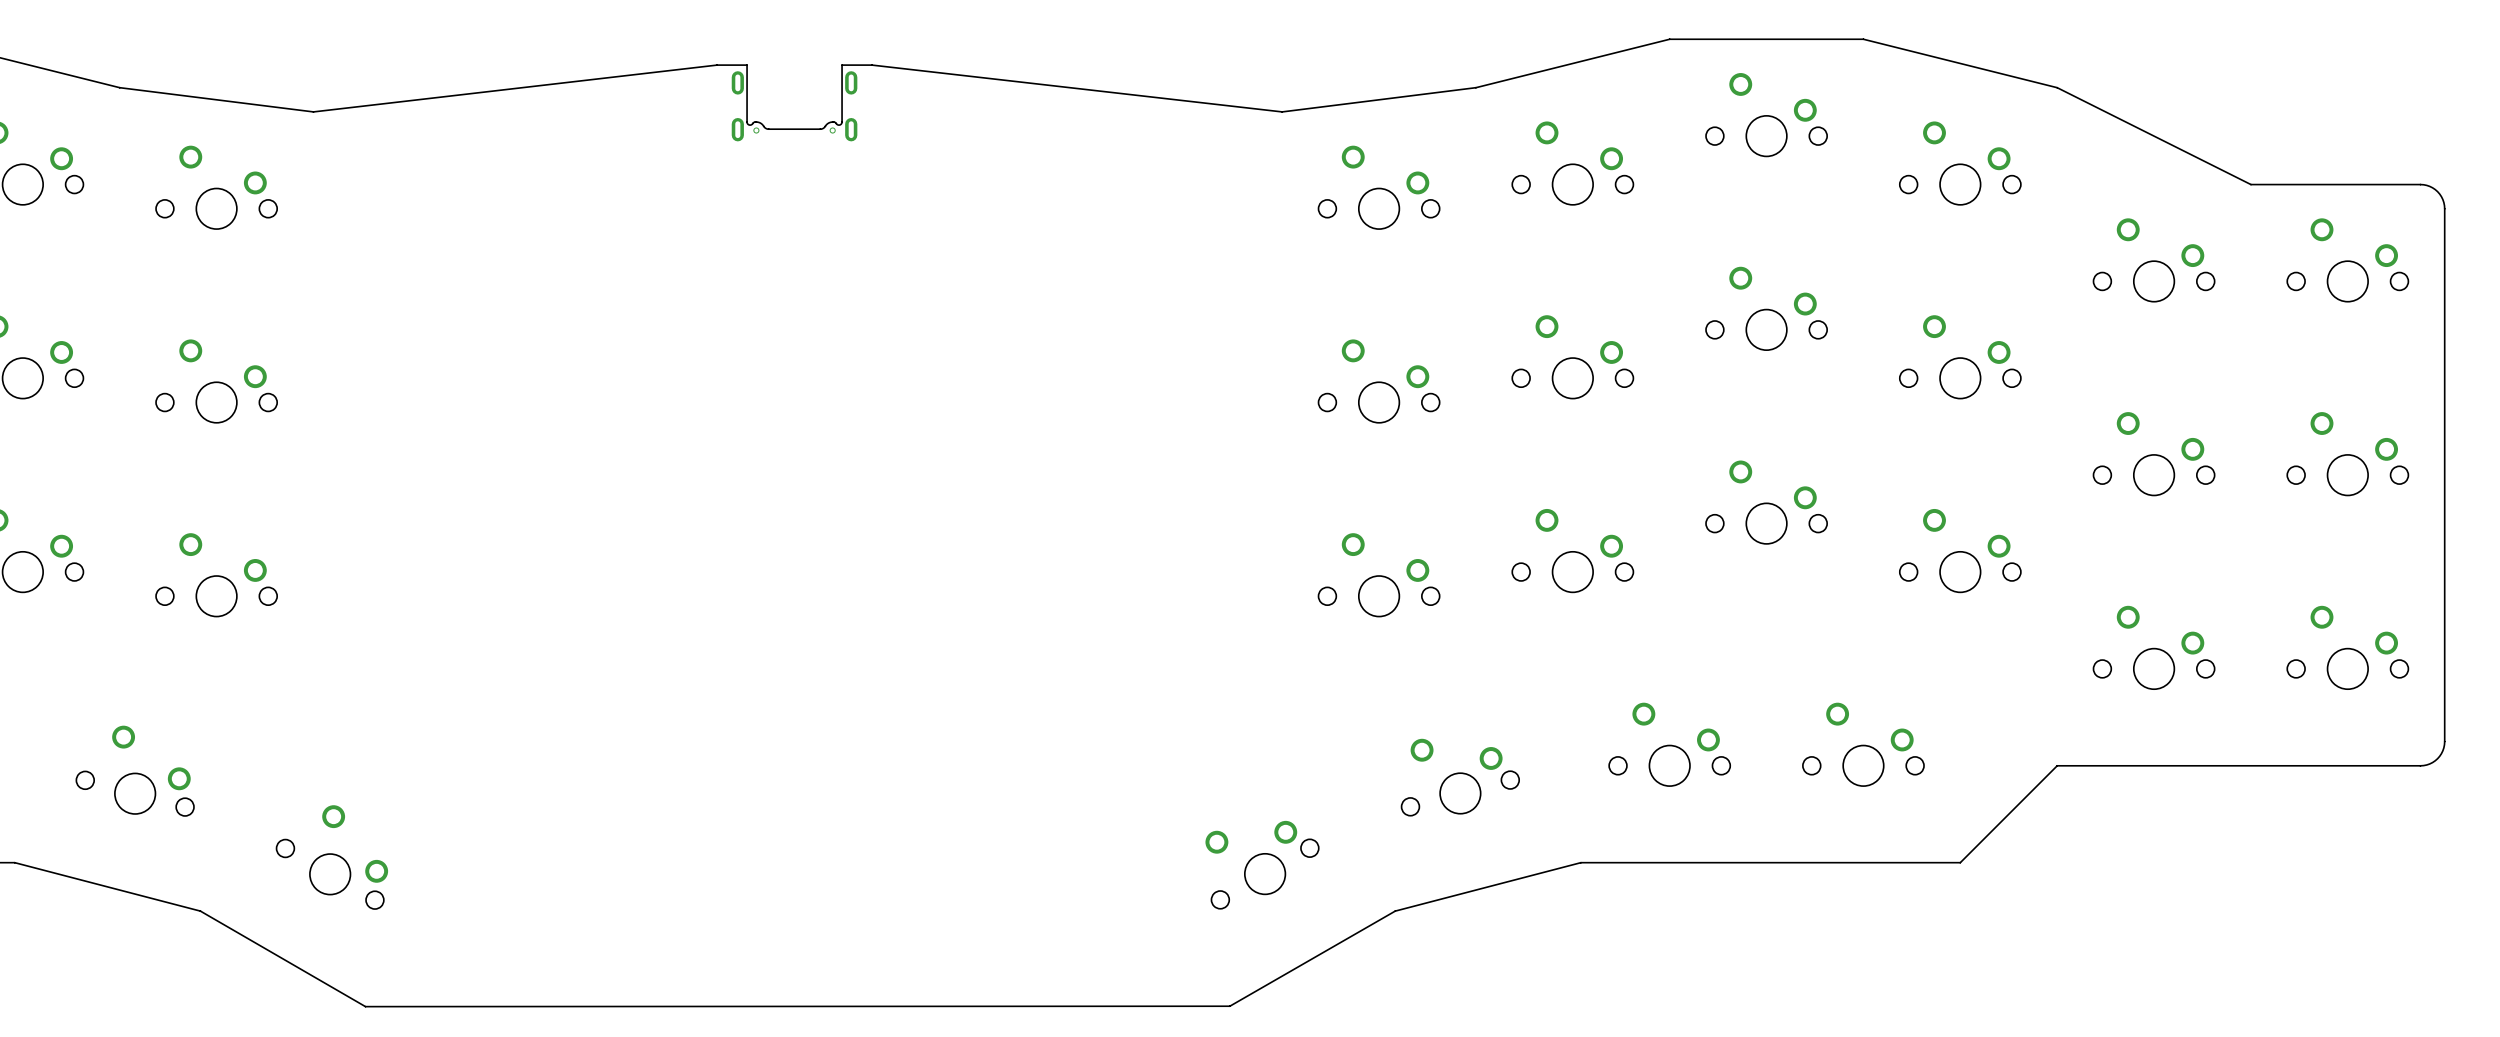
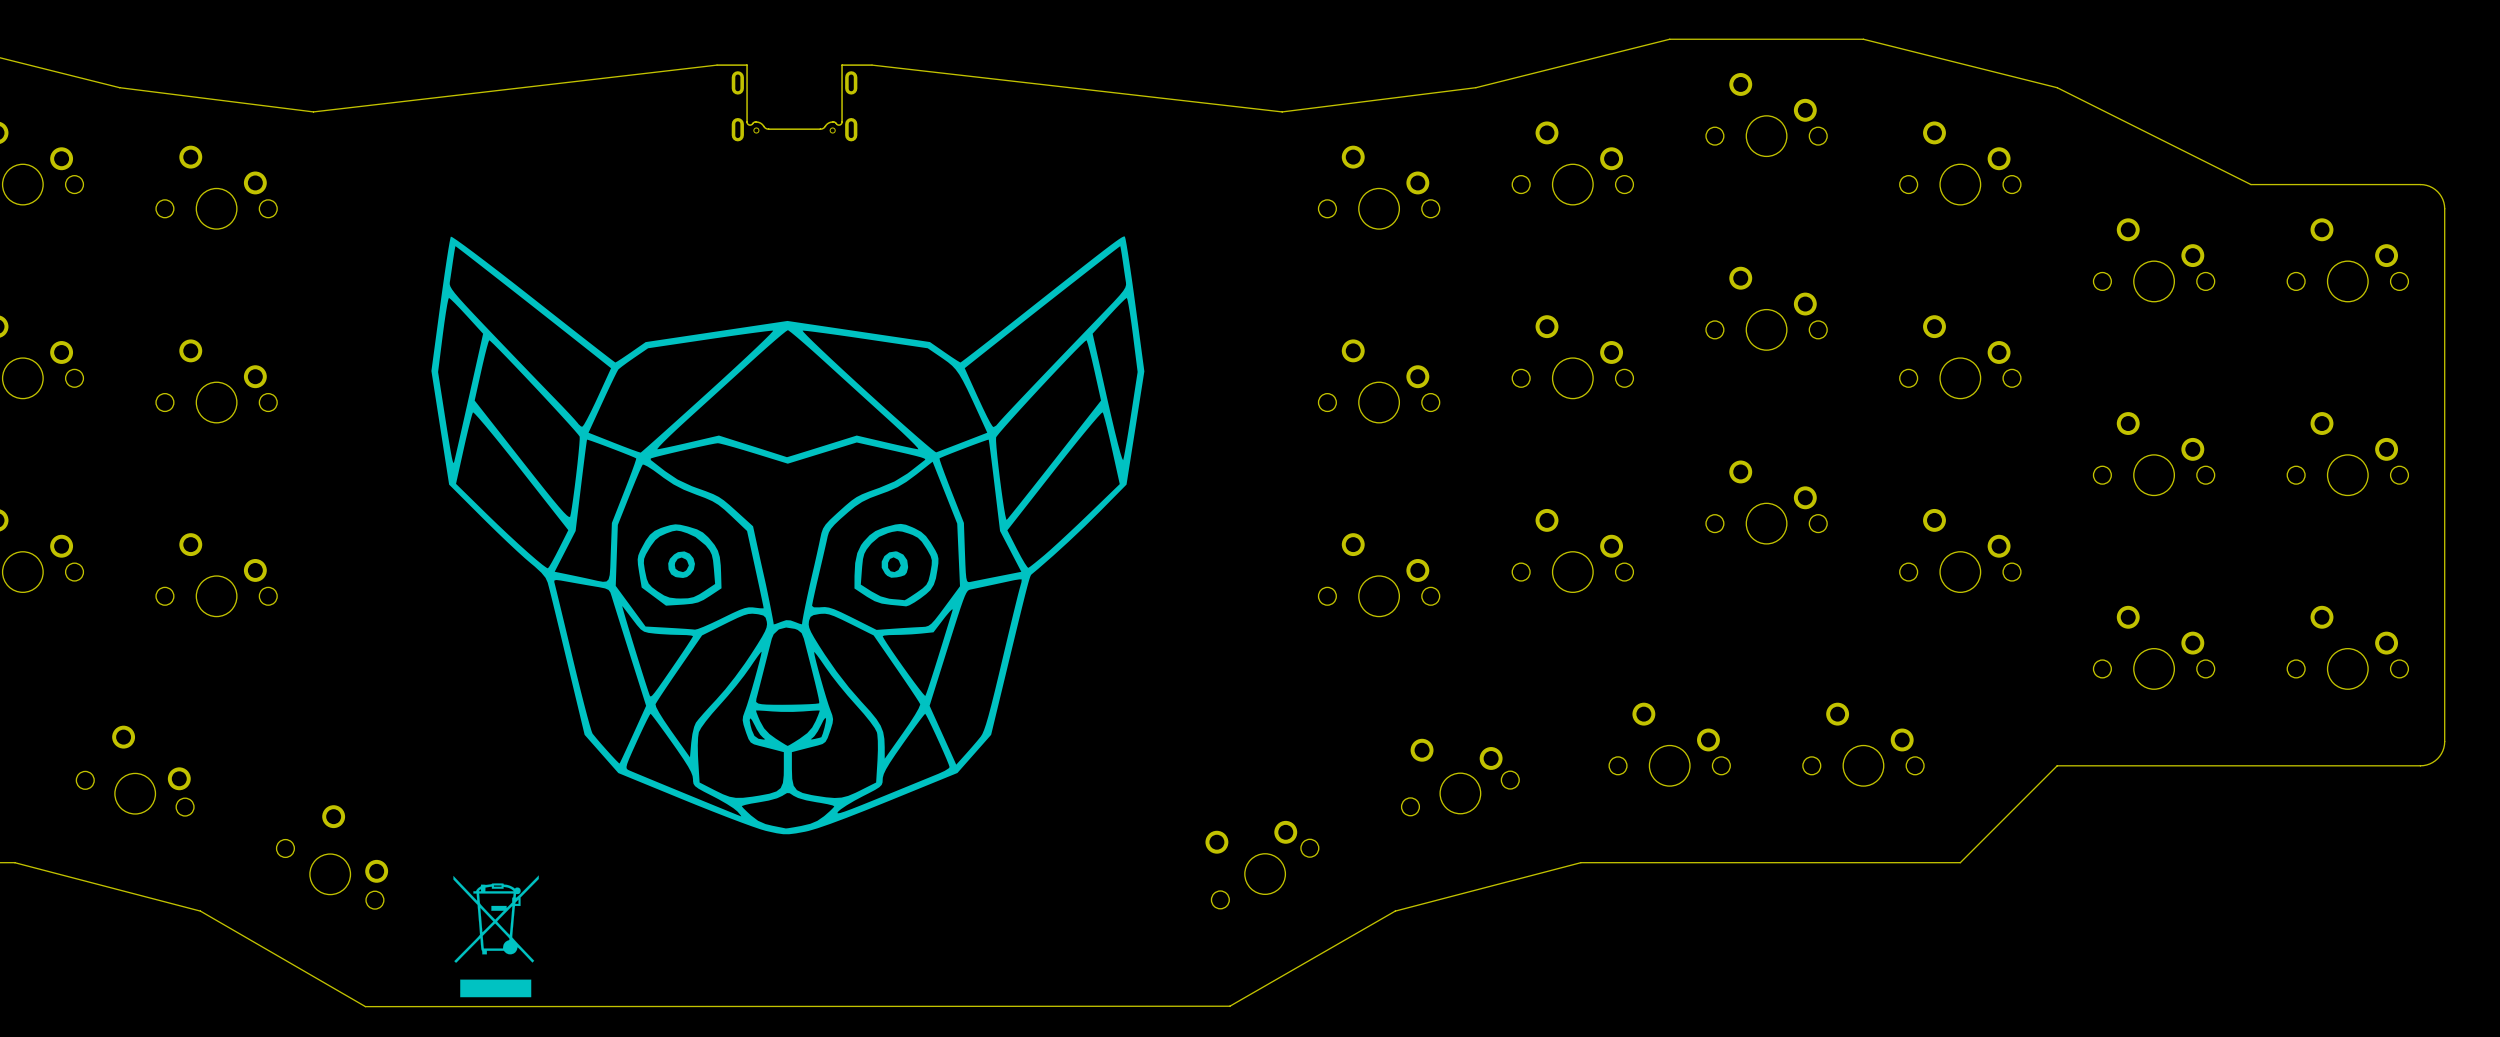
drawing: none -> [431, 236, 1145, 835]
drawing: none -> [453, 875, 539, 998]

